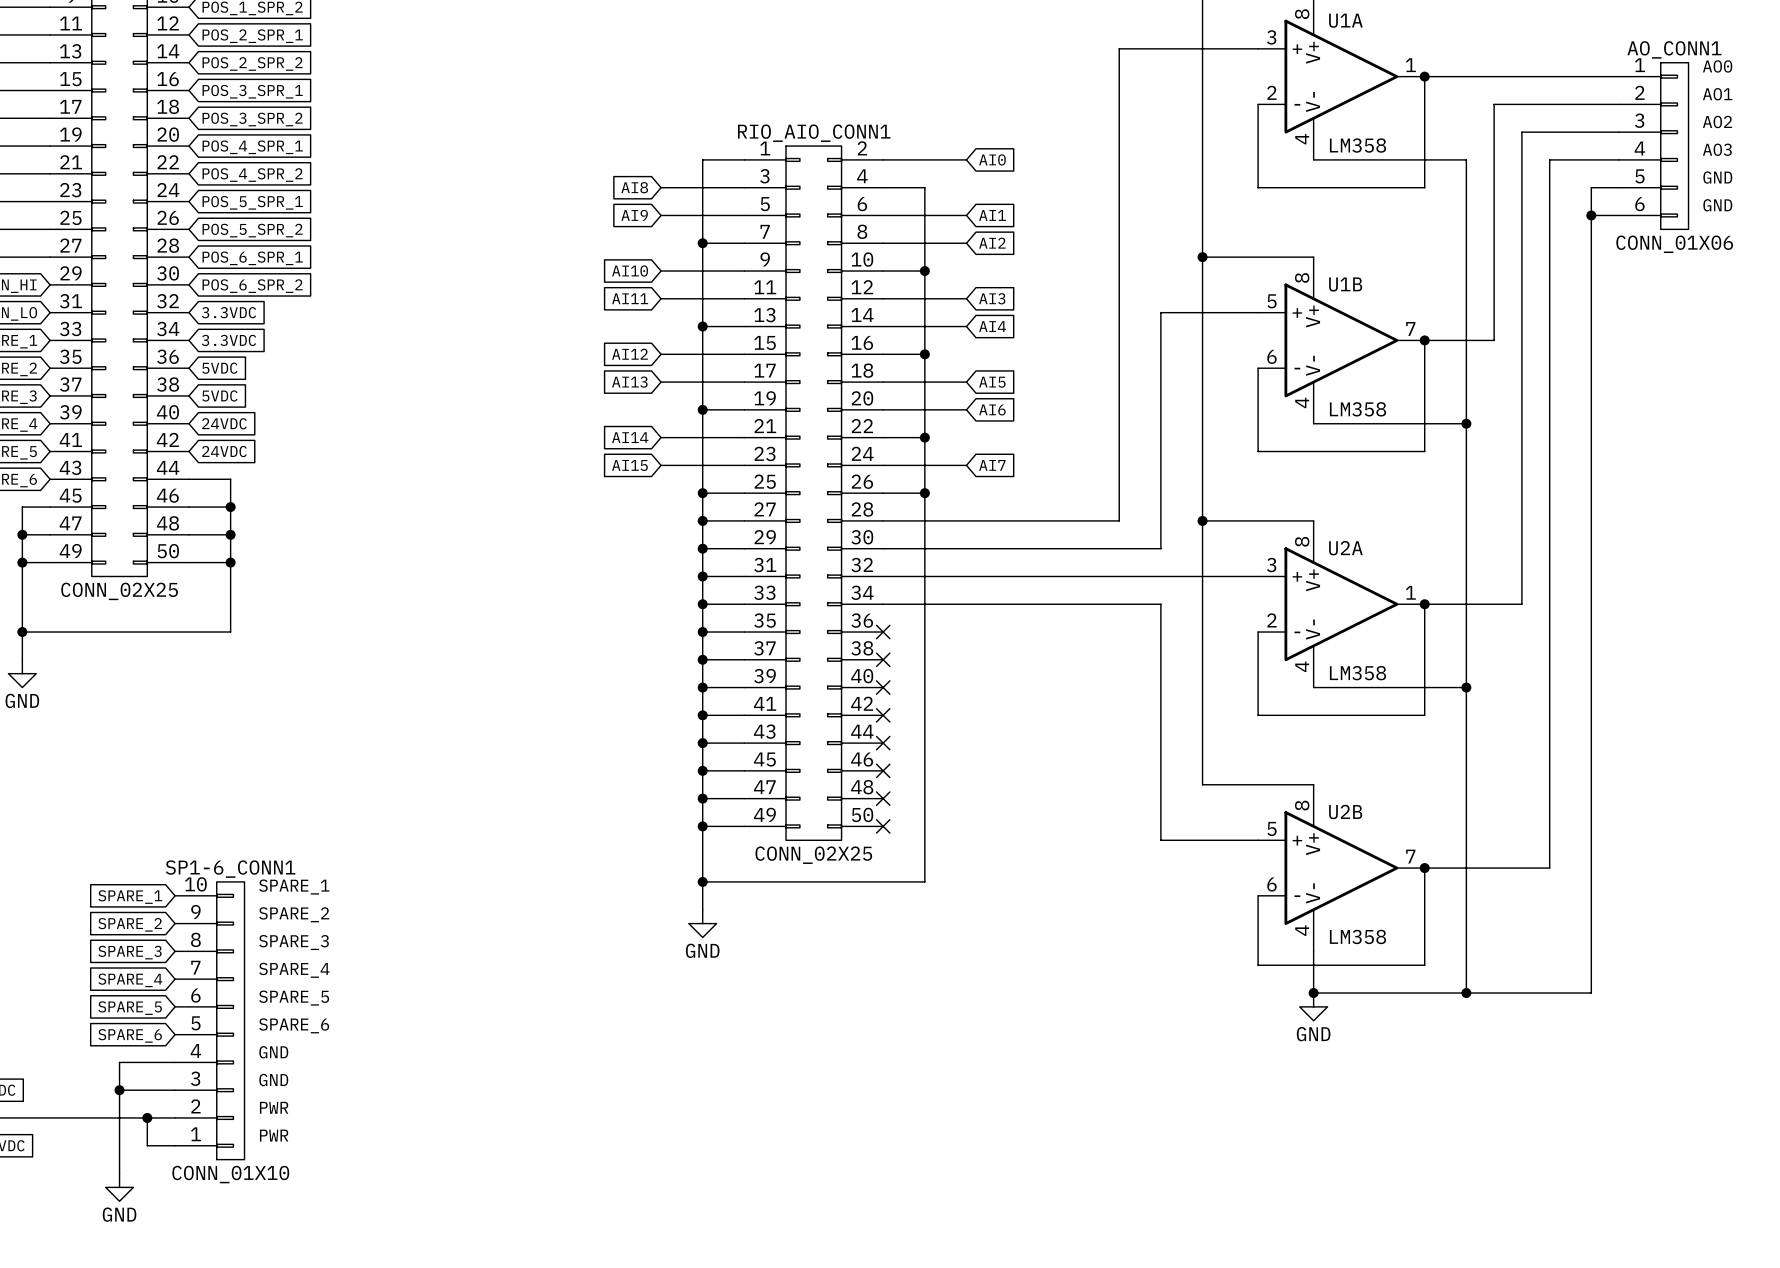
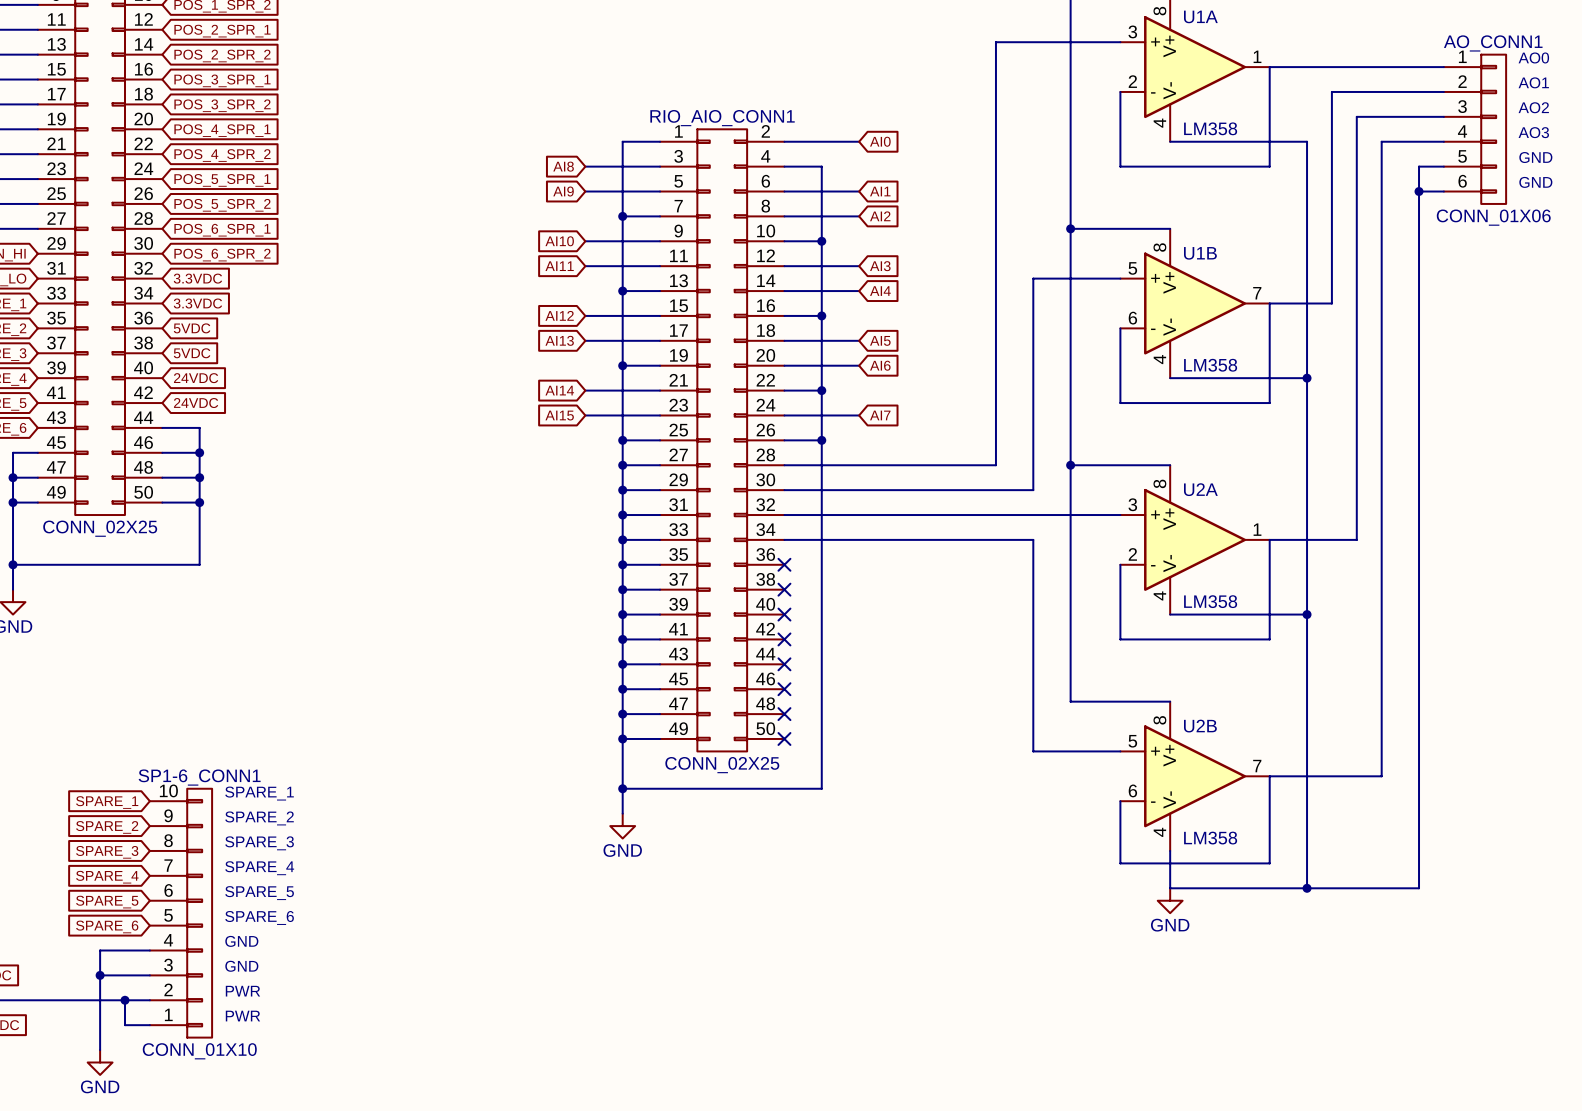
junction: (1424, 76) -> none
junction: (1424, 340) -> none
junction: (1424, 604) -> none
junction: (1424, 868) -> none
junction: (1313, 993) -> none

